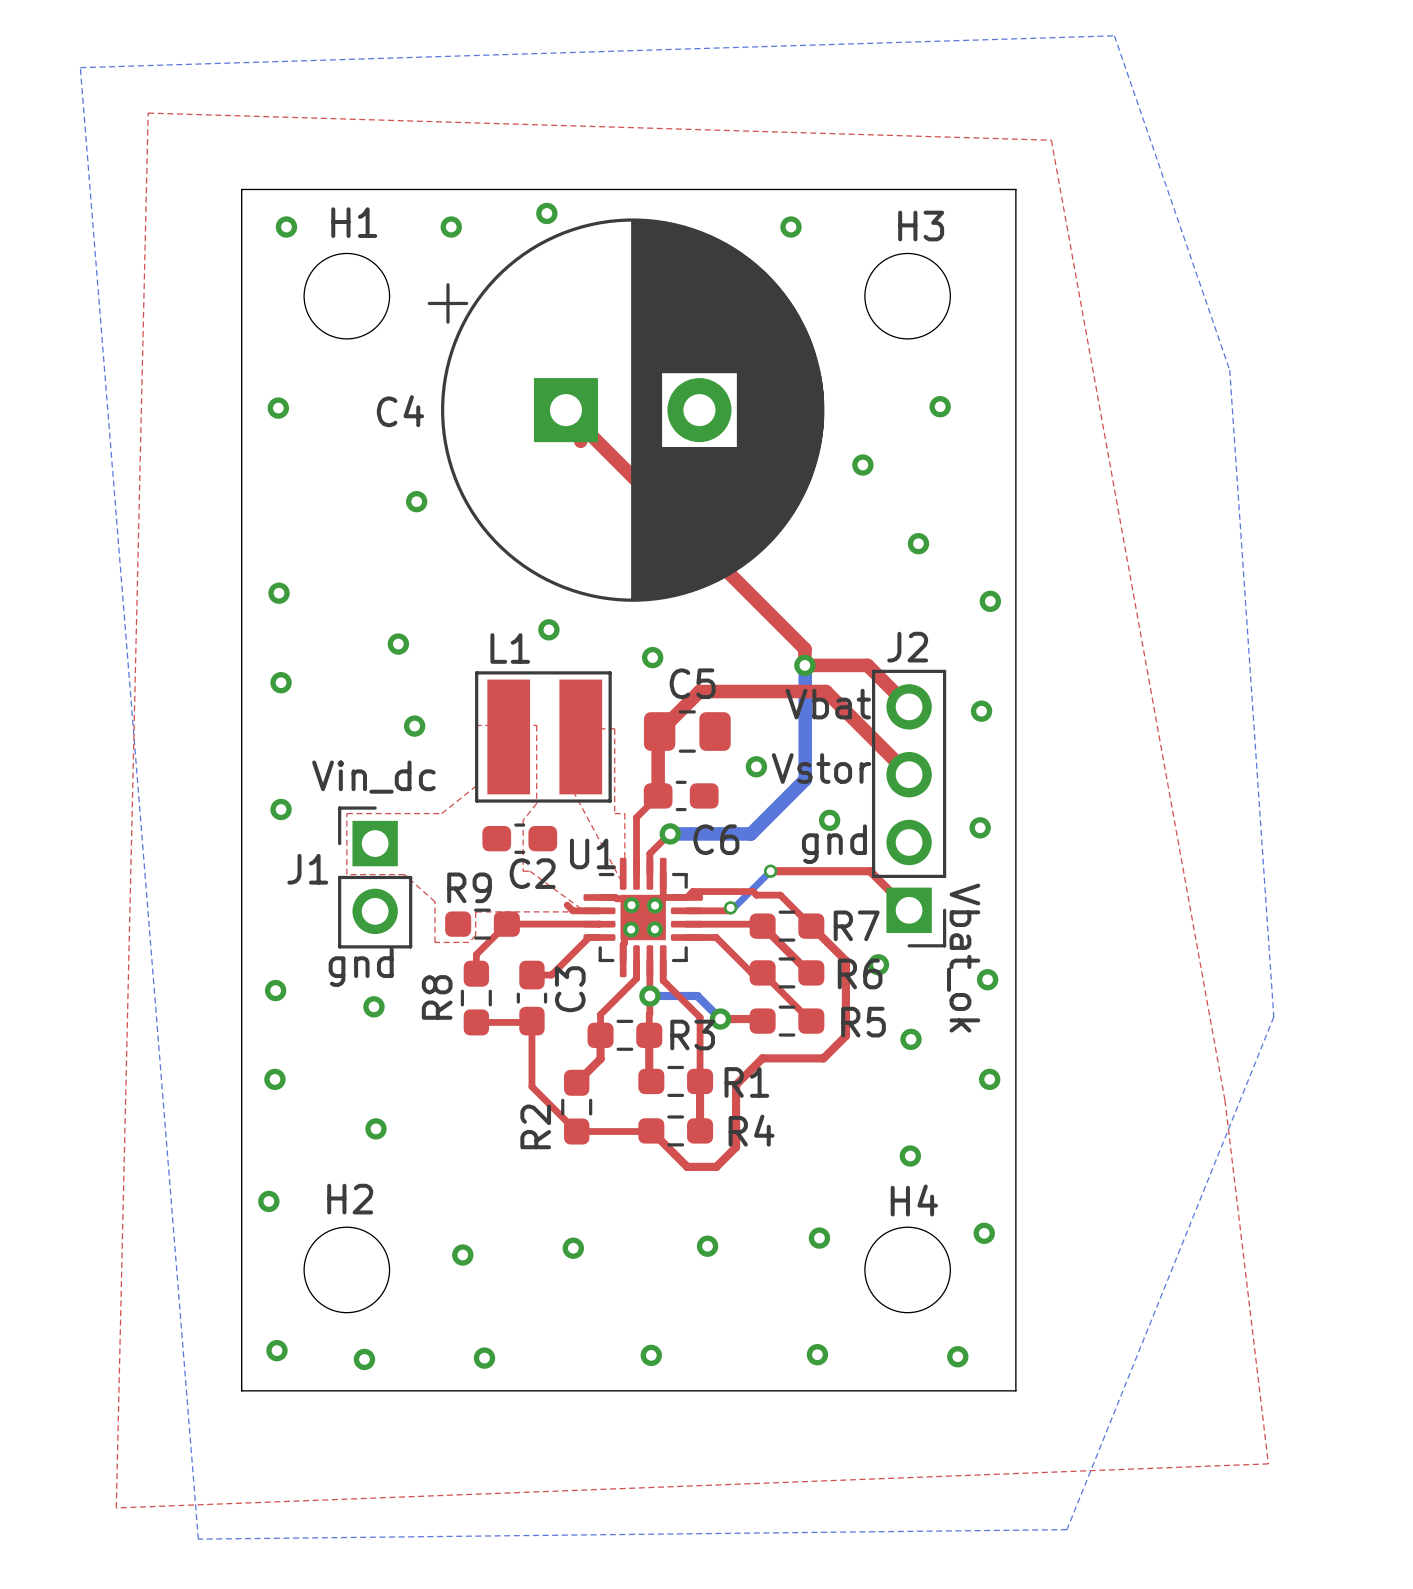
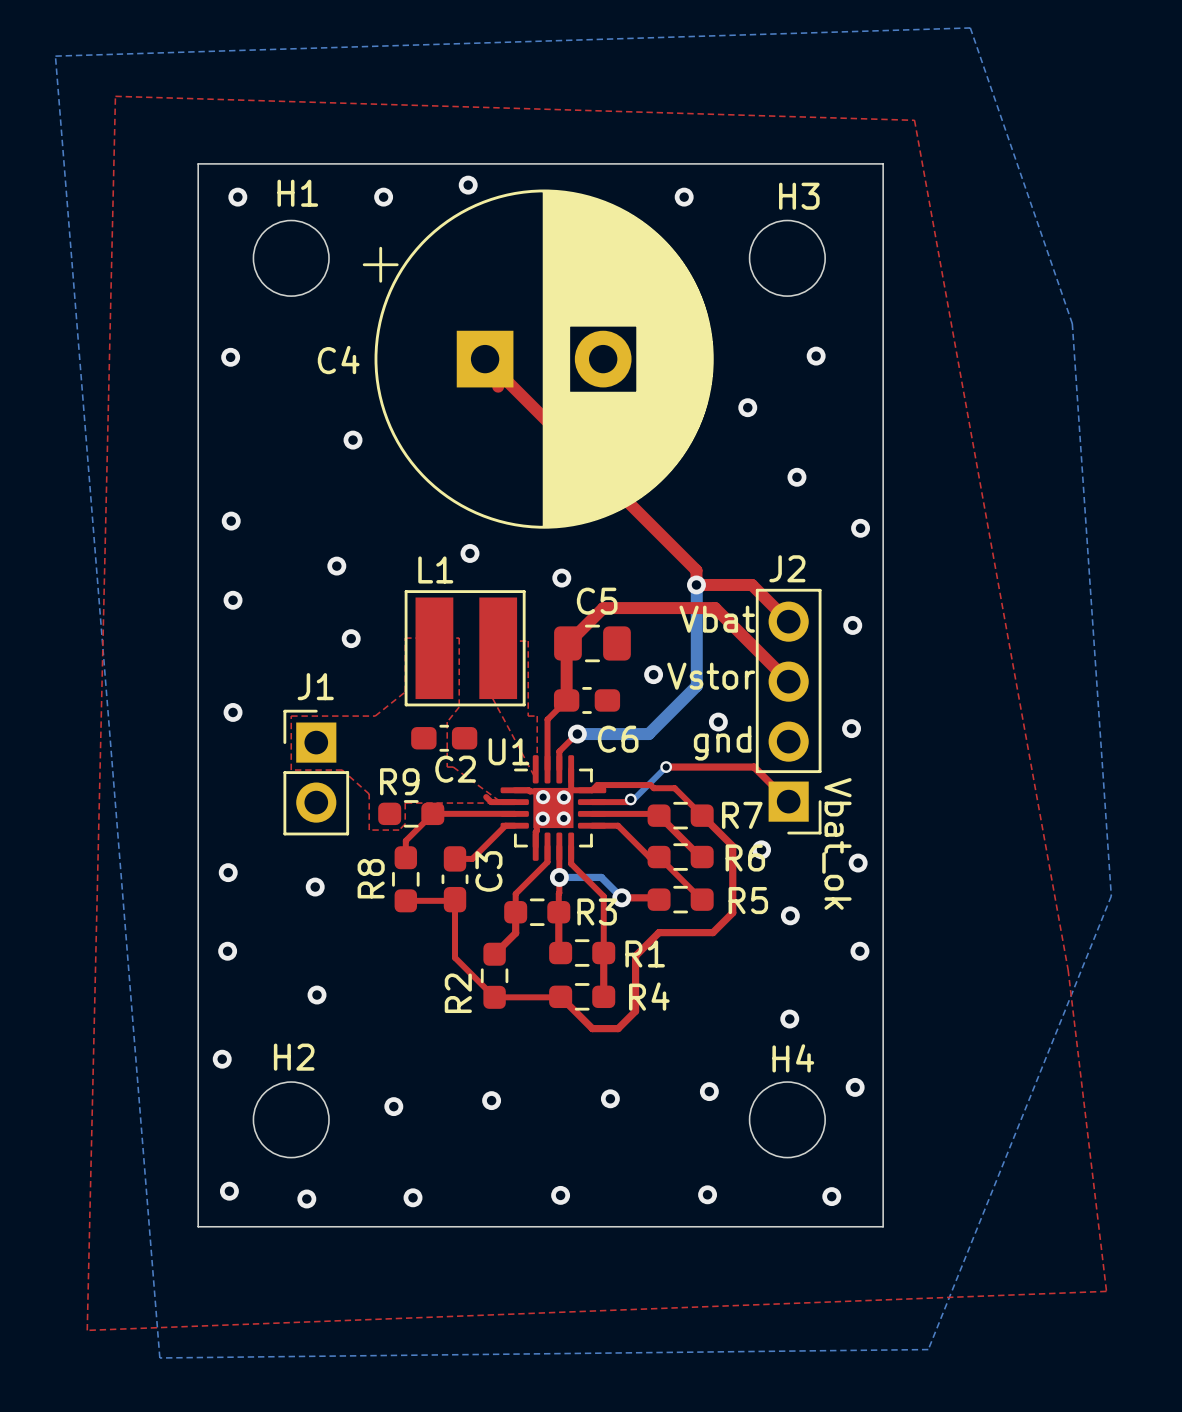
text: Vin_dc (373, 777) -> none
J1 name position: J1 (307, 869) -> J1 (315, 686)
text: gnd (361, 967) -> none

